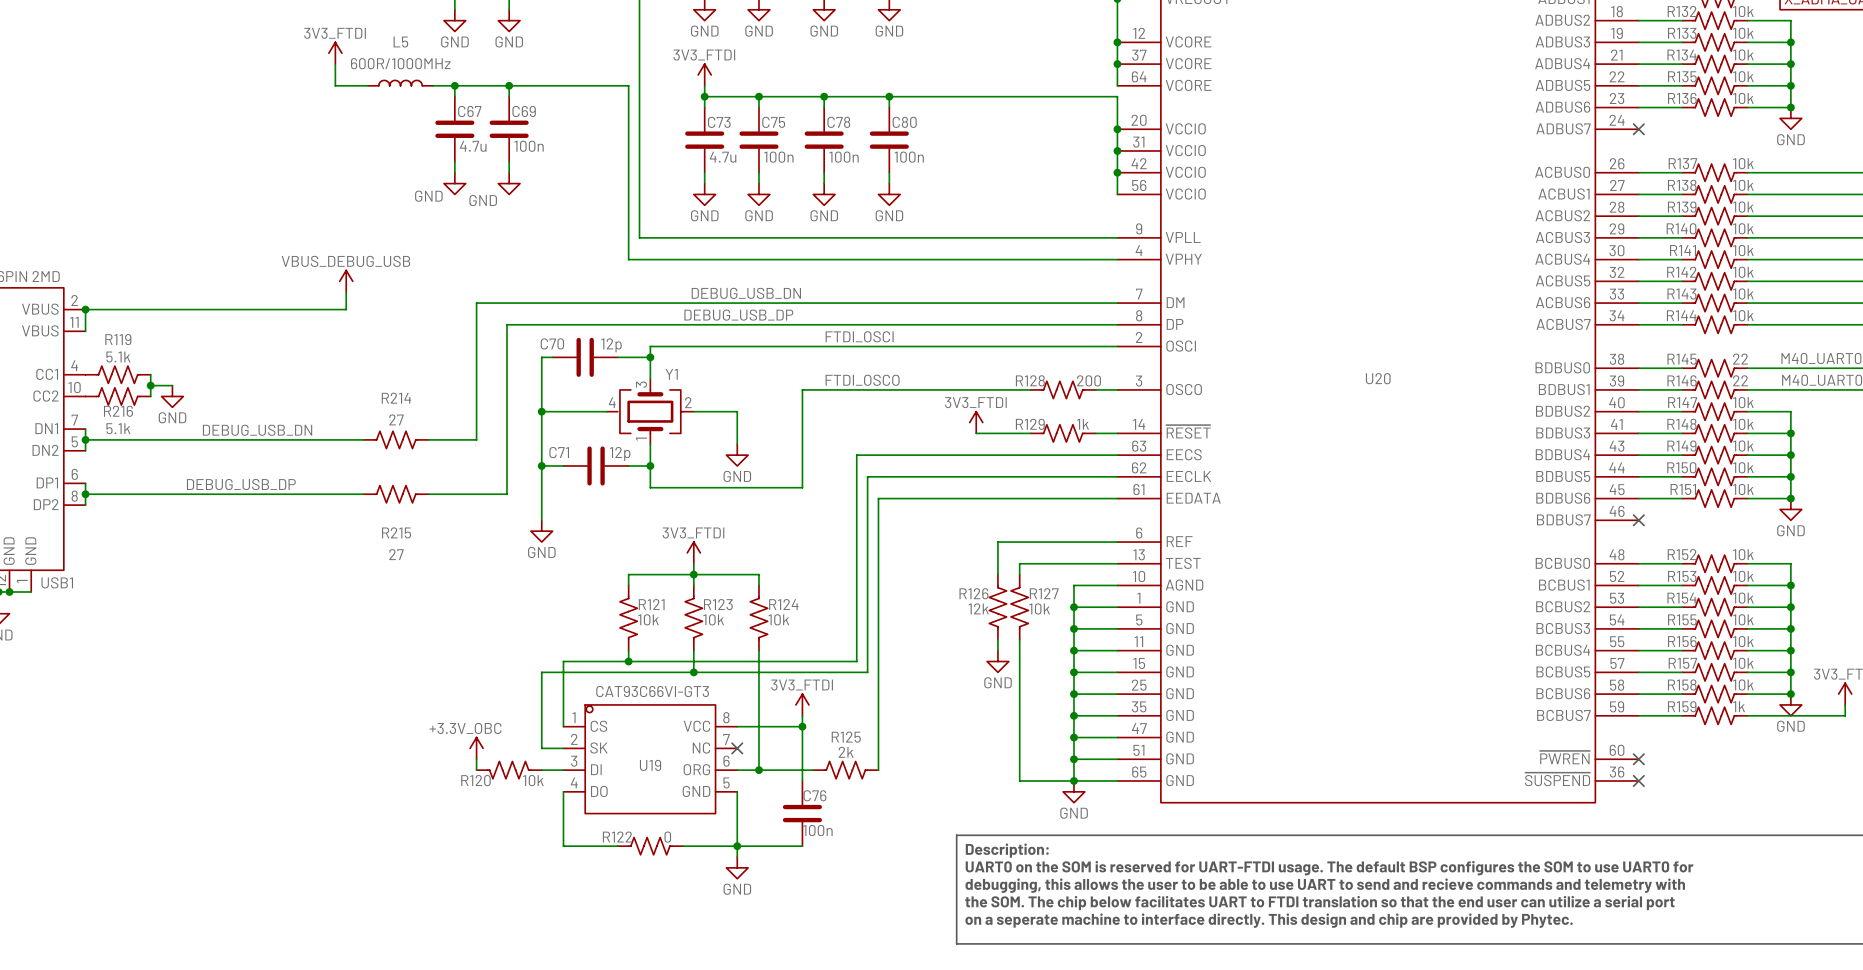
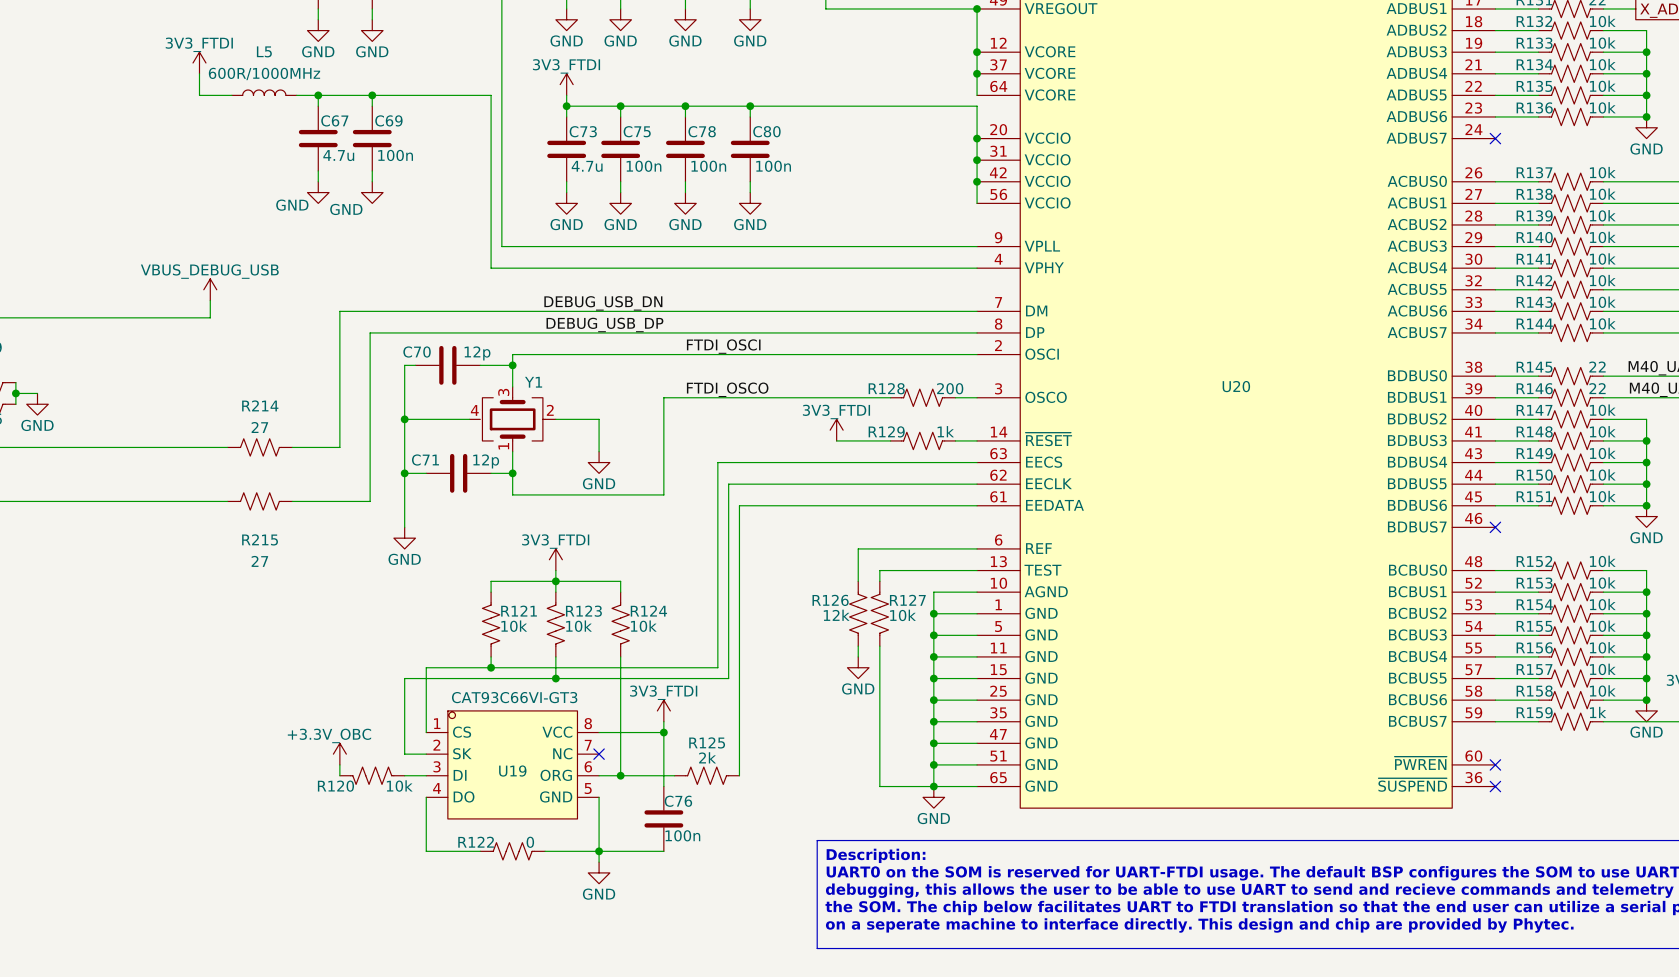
label: DEBUG_USB_DN (257, 430) -> none
label: DEBUG_USB_DP (241, 484) -> none

